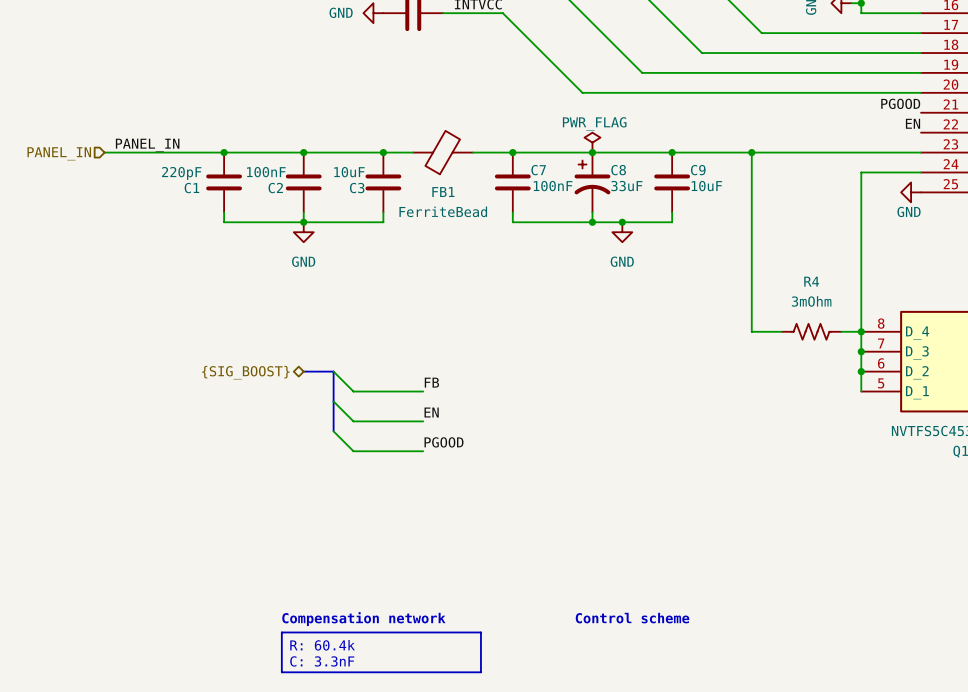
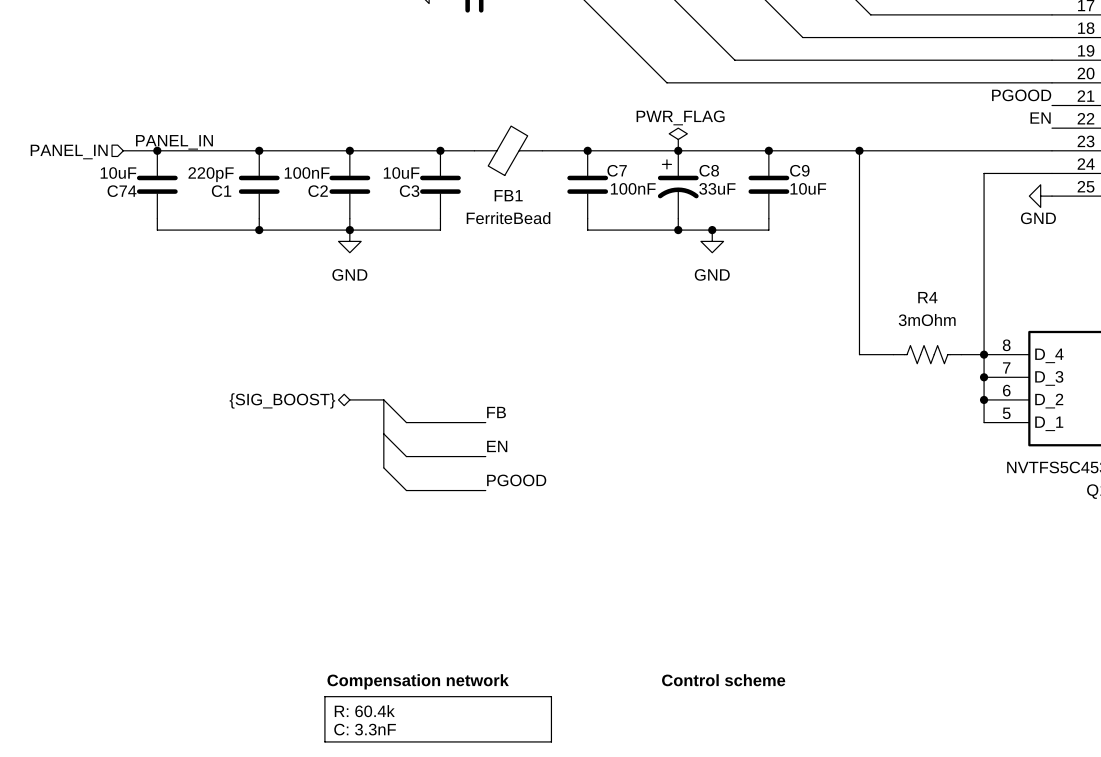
junction: none -> (157, 150)
C74: none -> 10uF (157, 184)
wire: none -> (157, 218) (157, 230) (259, 230)
junction: none -> (259, 230)

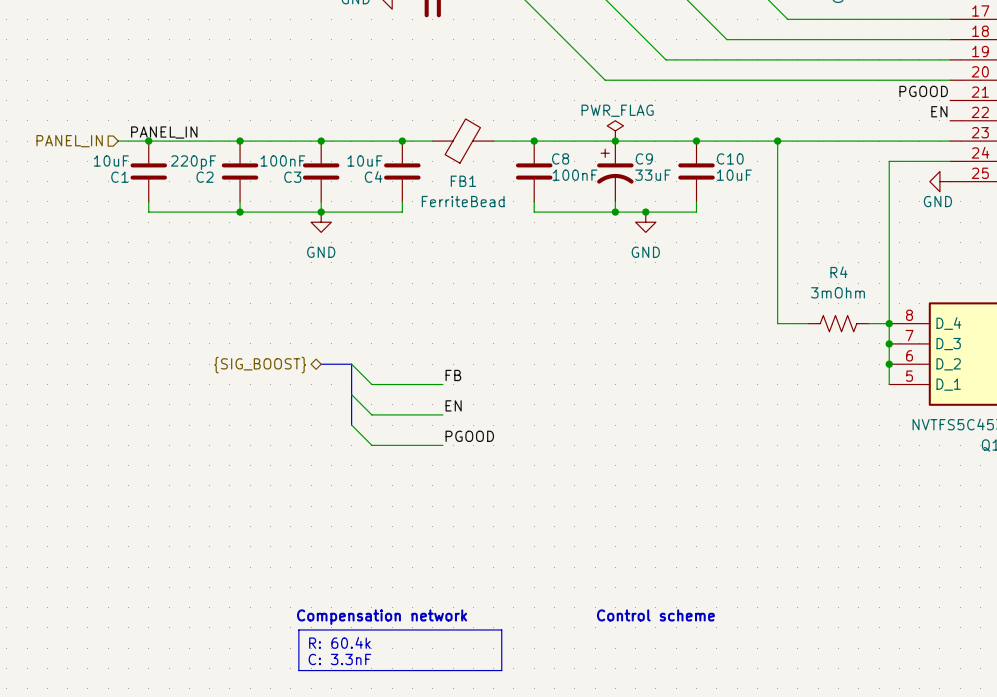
C7 name: C7 (617, 170) -> C8 (560, 158)
C8 name: C8 (709, 170) -> C9 (644, 158)
C9 name: C9 (799, 170) -> C10 (730, 158)
C74 name: C74 (122, 191) -> C1 (119, 177)
C1 name: C1 (221, 191) -> C2 (204, 177)
C2 name: C2 (318, 191) -> C3 (292, 177)
C3 name: C3 (409, 191) -> C4 (373, 176)

